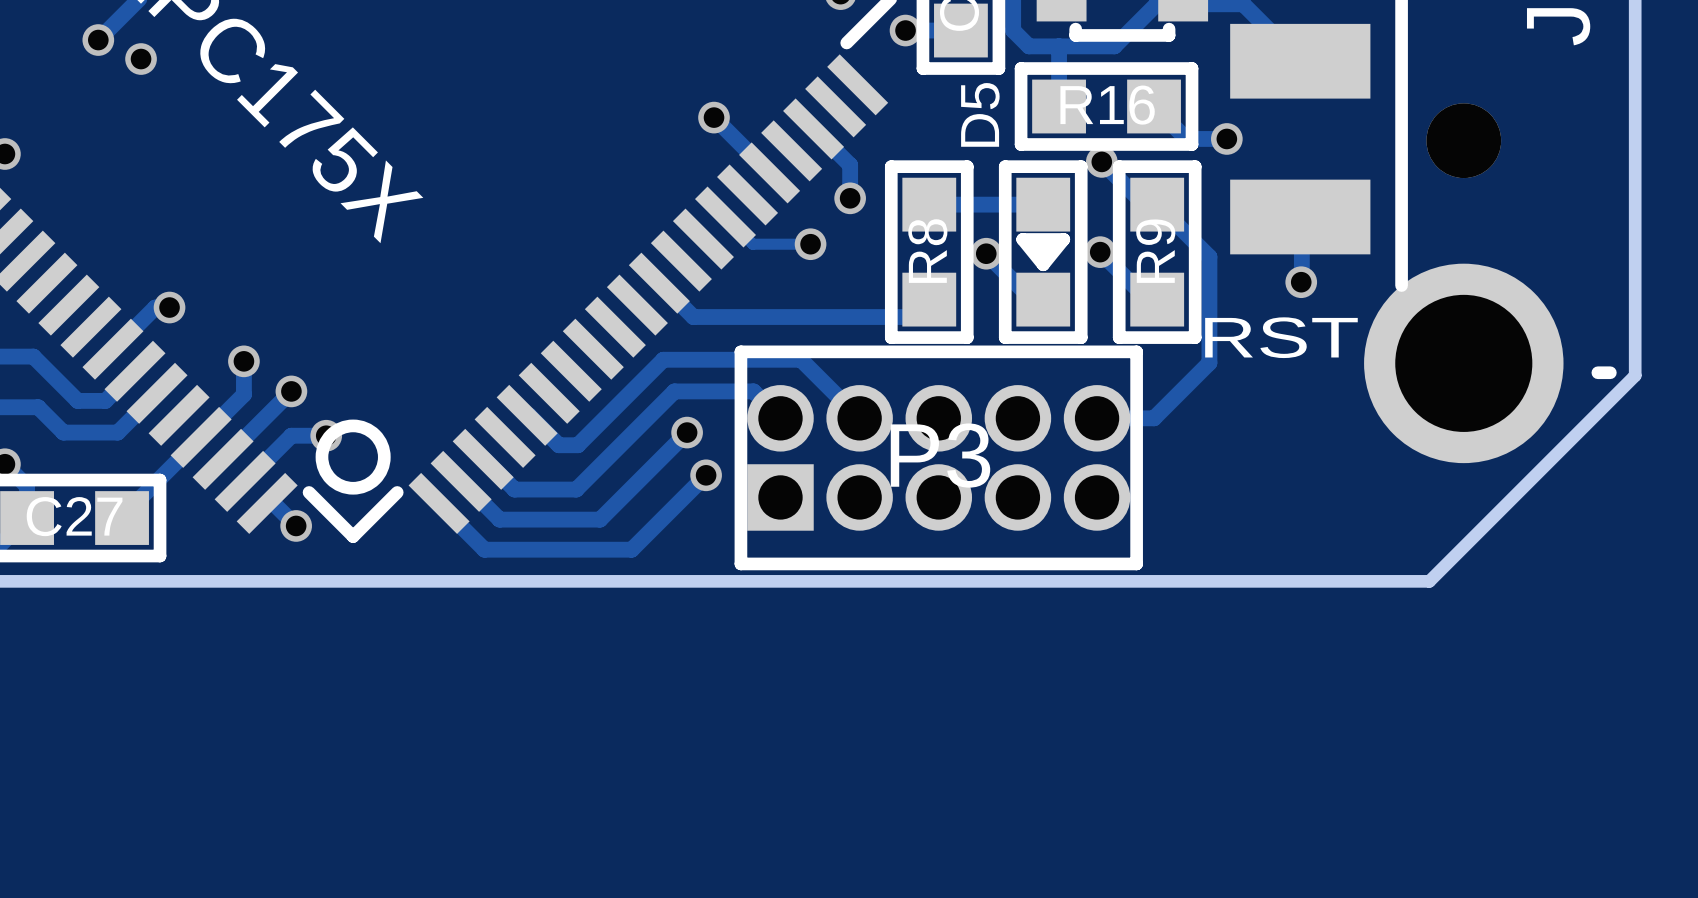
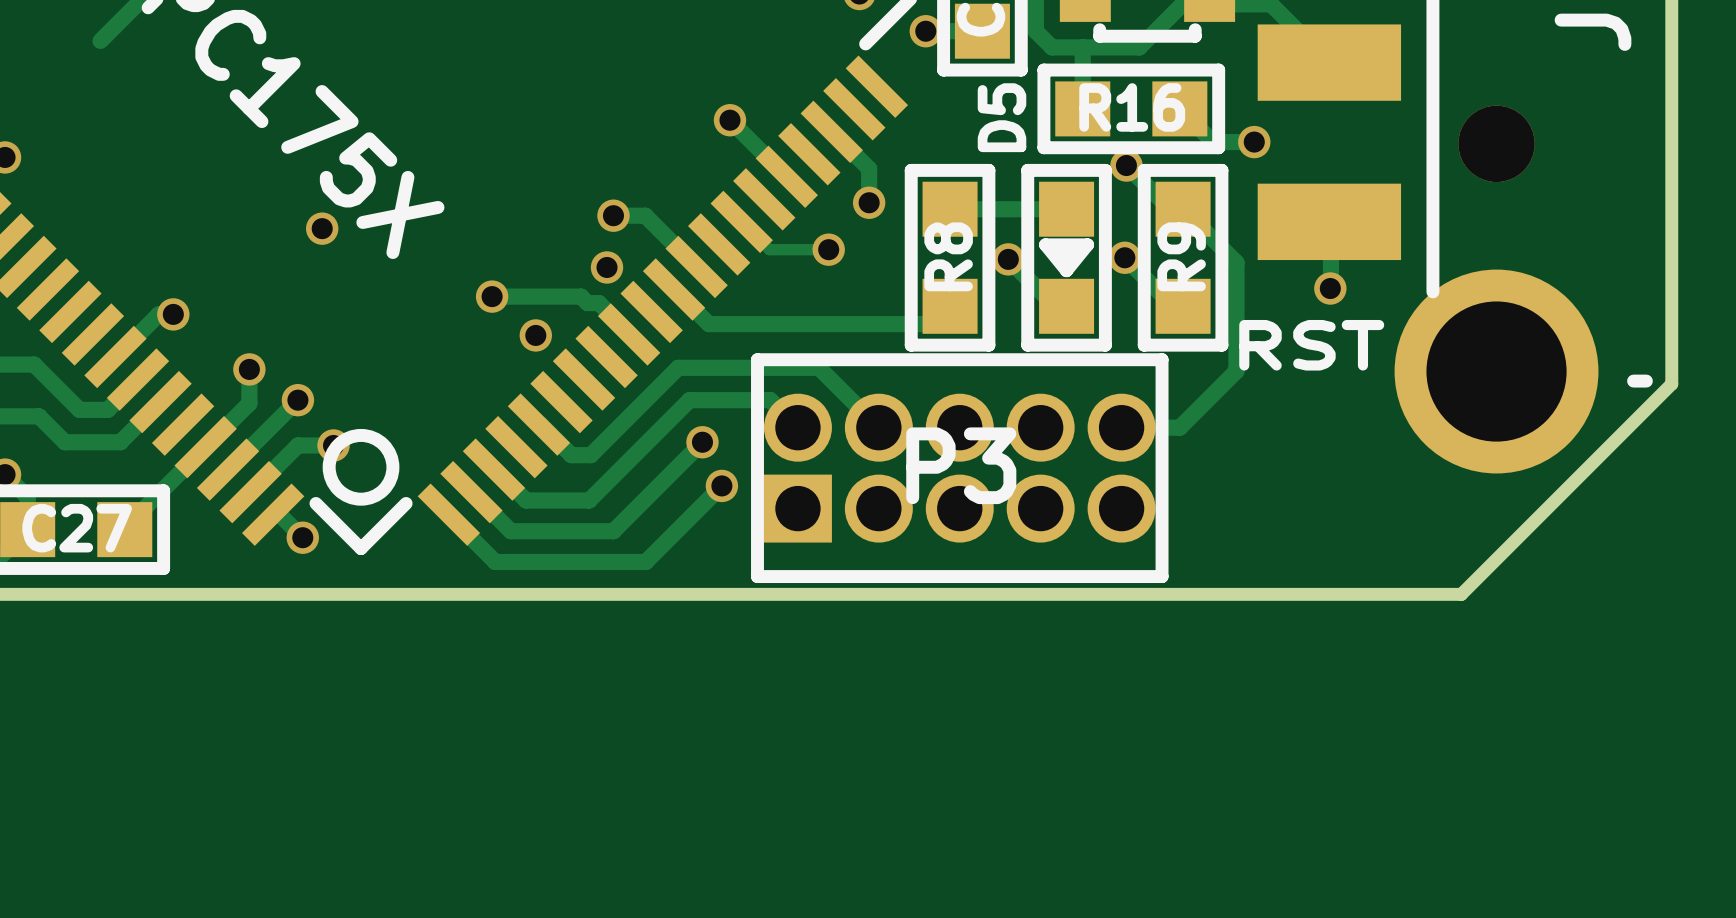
via: (98, 40) -> none
via: (141, 59) -> none
track: none -> (613, 215) (645, 215) (696, 266)
via: none -> (613, 215)
via: none -> (322, 228)
via: none -> (607, 267)
track: none -> (492, 296) (581, 296) (587, 303) (598, 303) (629, 333)
via: none -> (492, 296)
via: none -> (535, 335)

